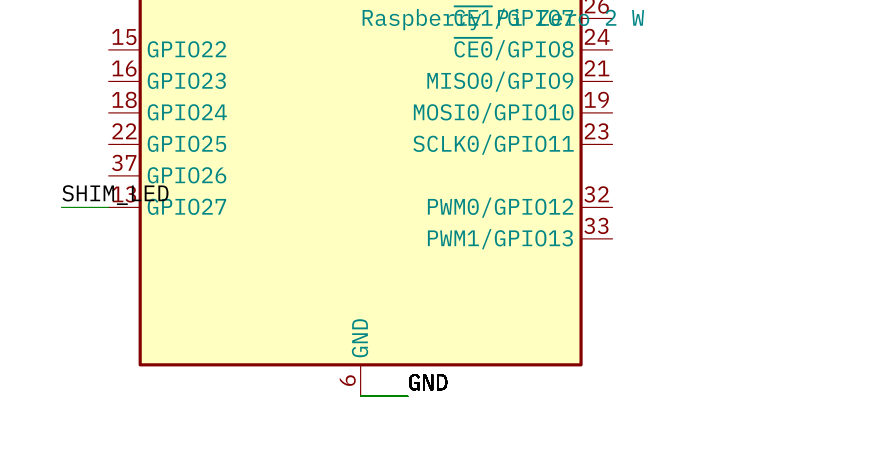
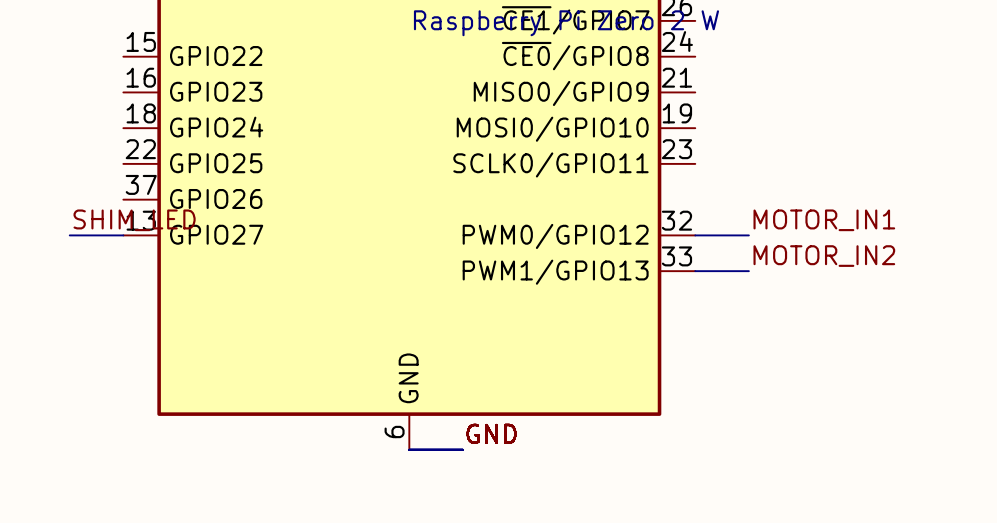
label: none -> MOTOR_IN1 (824, 220)
wire: none -> (695, 235) (748, 235)
label: none -> MOTOR_IN2 (824, 256)
wire: none -> (695, 271) (748, 271)

